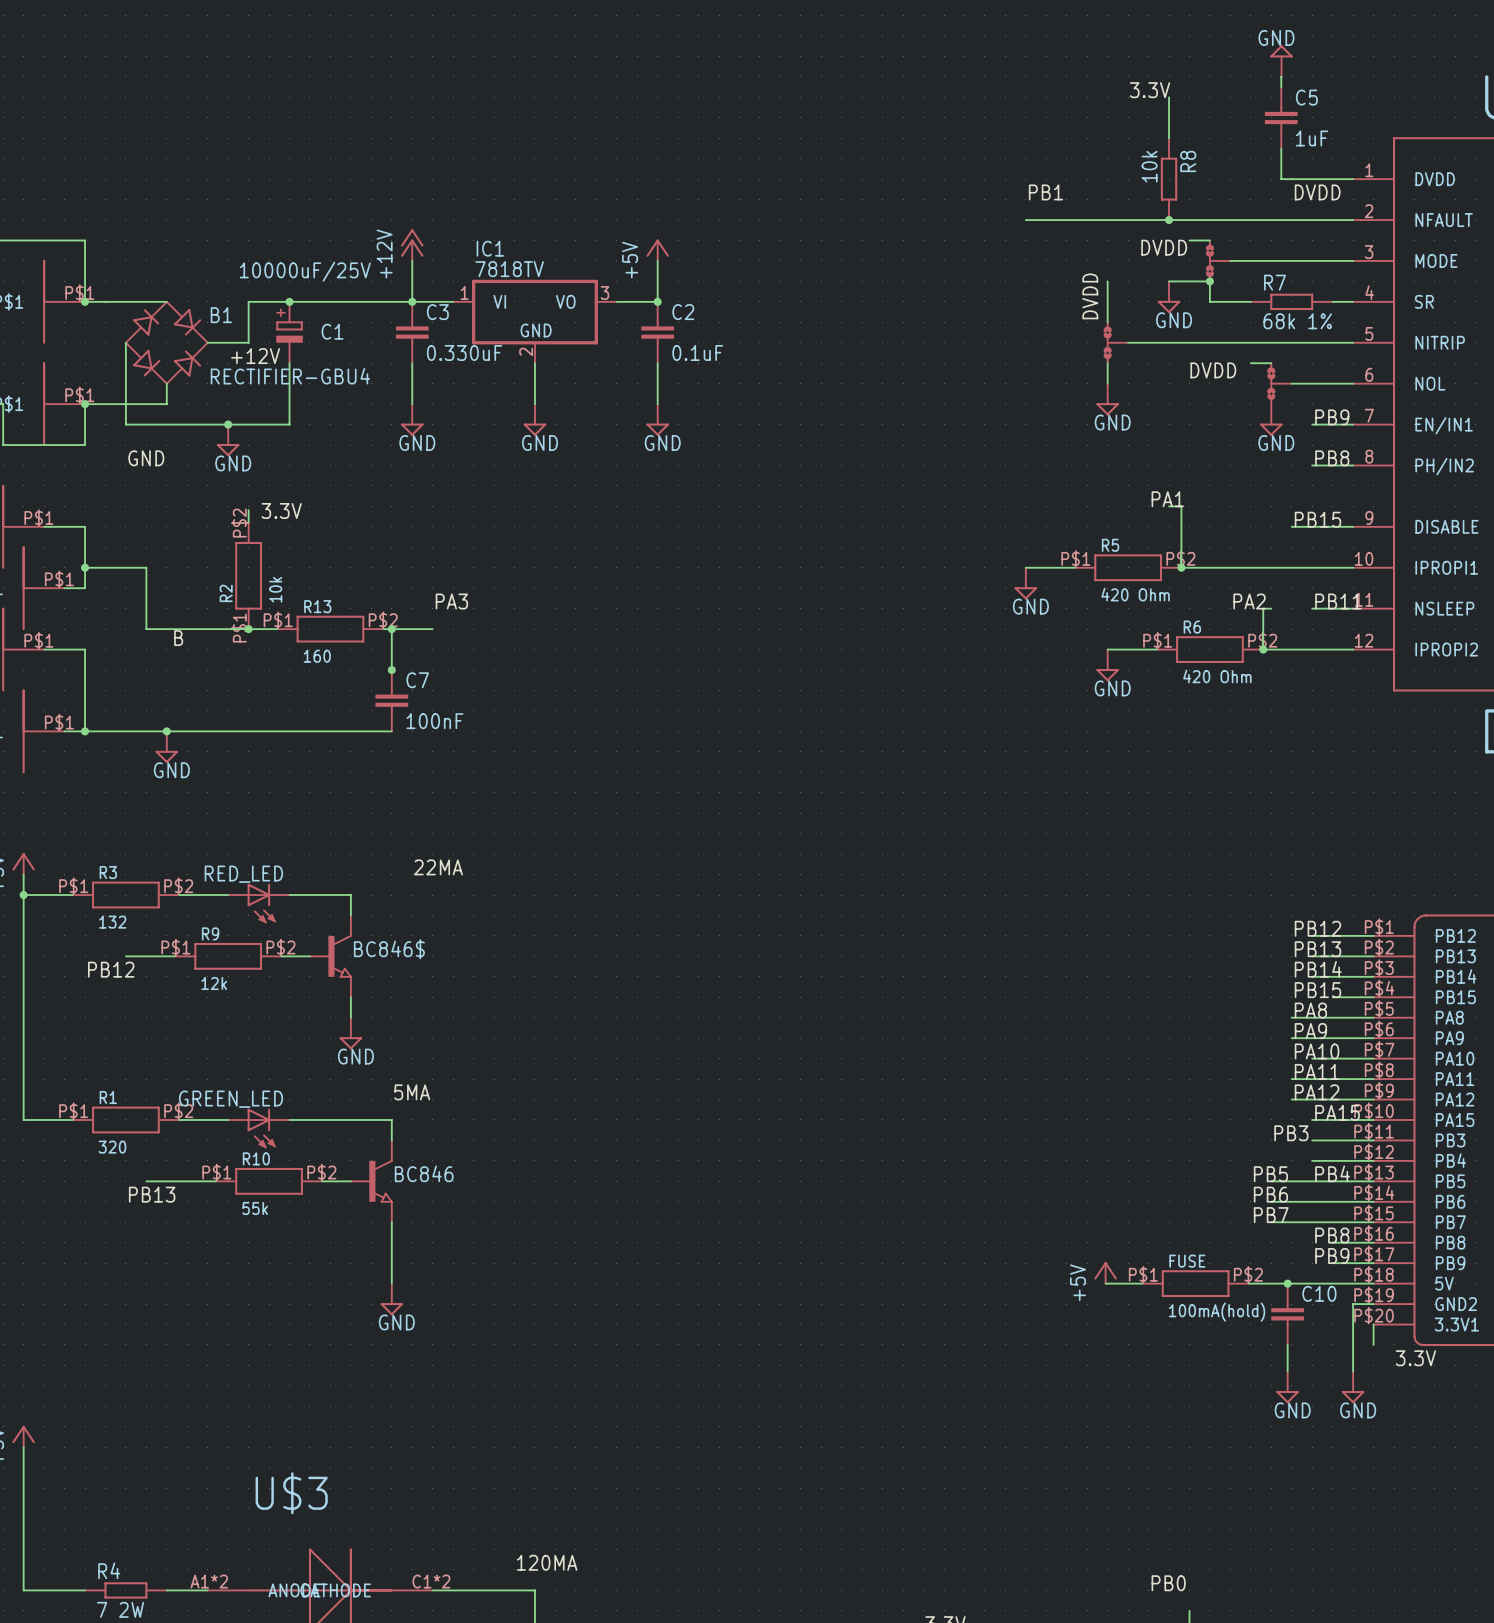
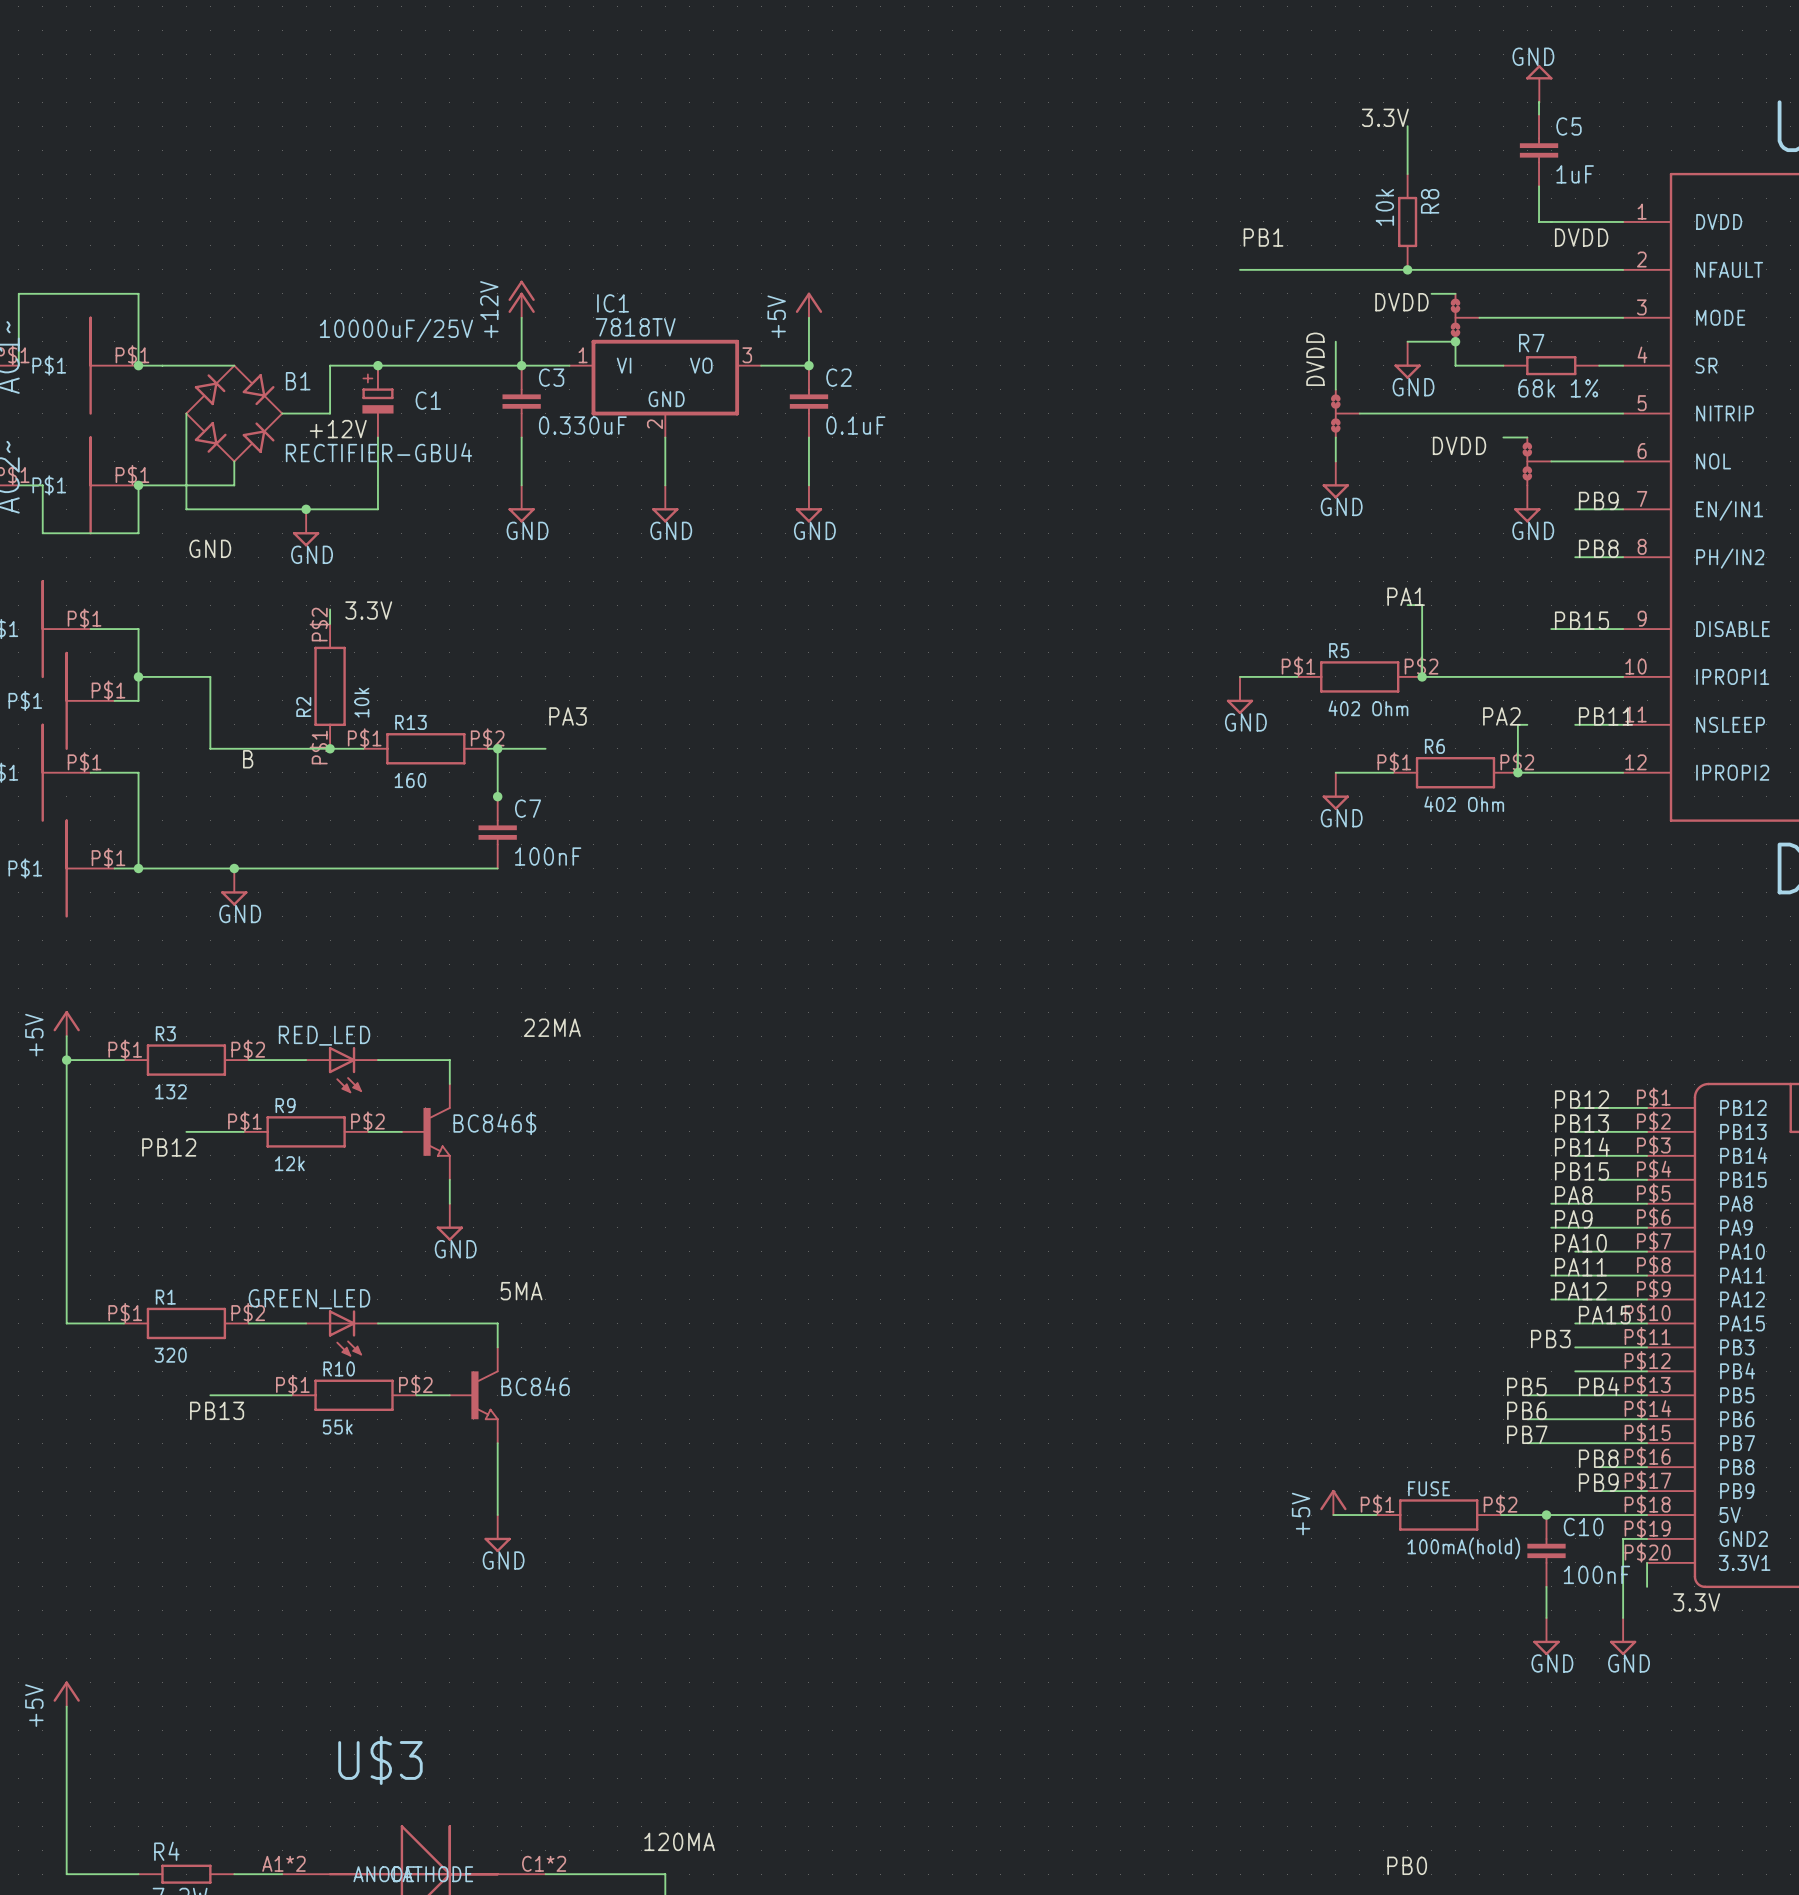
R5 value: 420 Ohm (1135, 594) -> 402 Ohm (1368, 708)
R6 value: 420 Ohm (1217, 676) -> 402 Ohm (1464, 804)
C10 value: none -> 100nF (1596, 1574)

